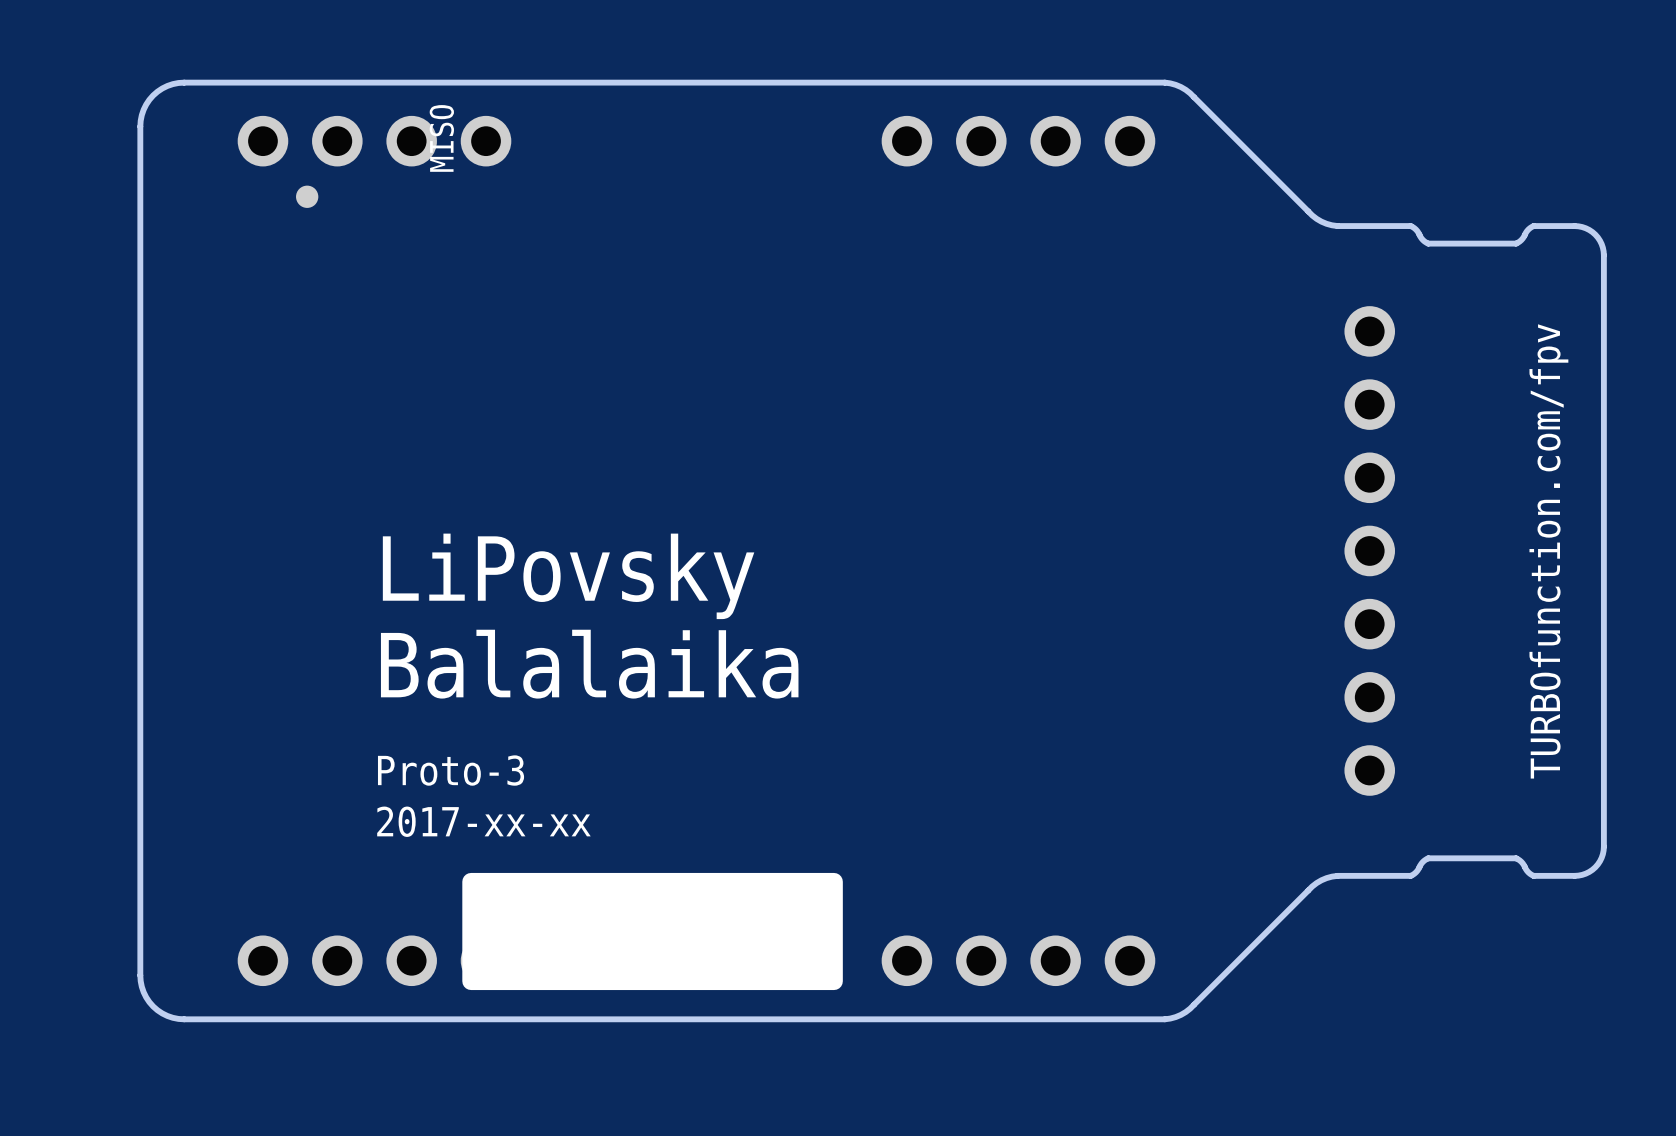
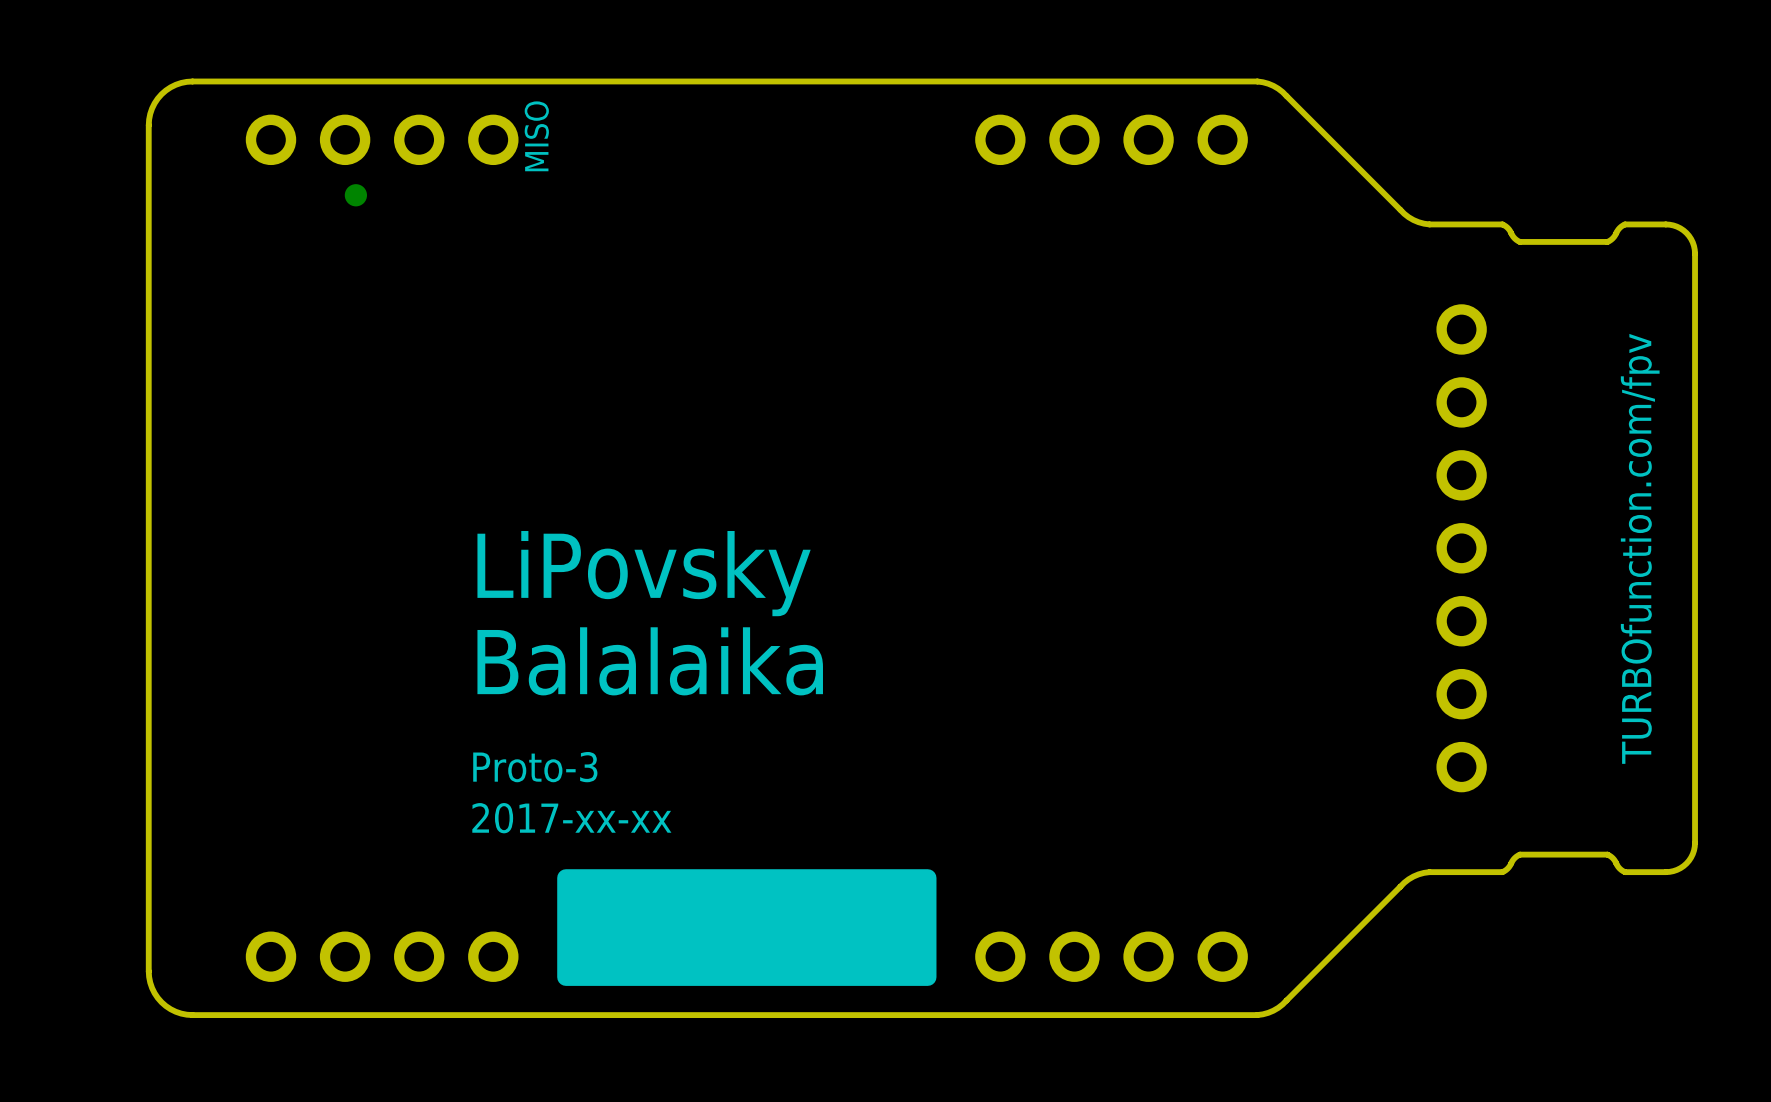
board edge: (184, 82) (167, 85) (153, 95) (143, 109) (140, 126) (140, 975) (143, 992) (153, 1006) (167, 1015) (184, 1019) -> (280, 81) (181, 82) (170, 87) (157, 98) (150, 113) (148, 125) (149, 977) (152, 988) (161, 1002) (181, 1013) (280, 1015)
part position: (374, 141) -> (382, 139)
part position: (307, 196) -> (355, 195)
part position: (374, 960) -> (382, 956)

